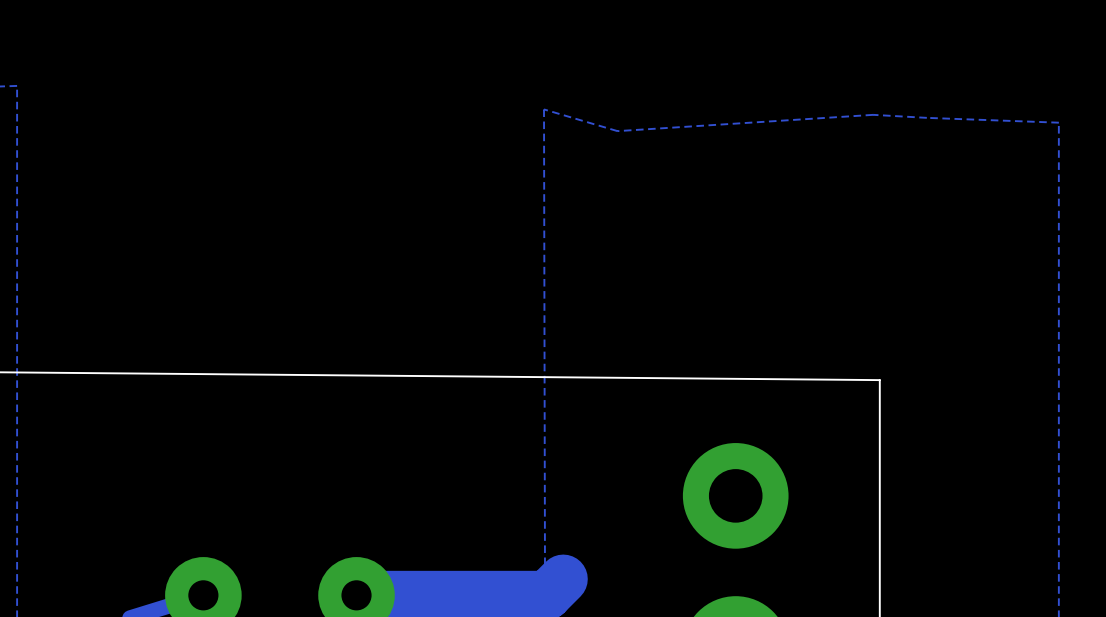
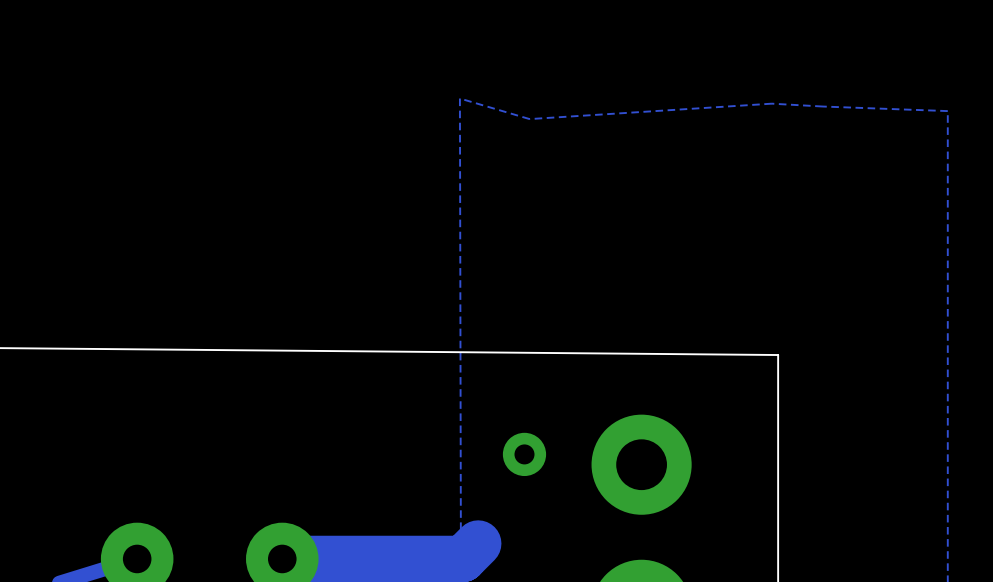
via: none -> (524, 454)

